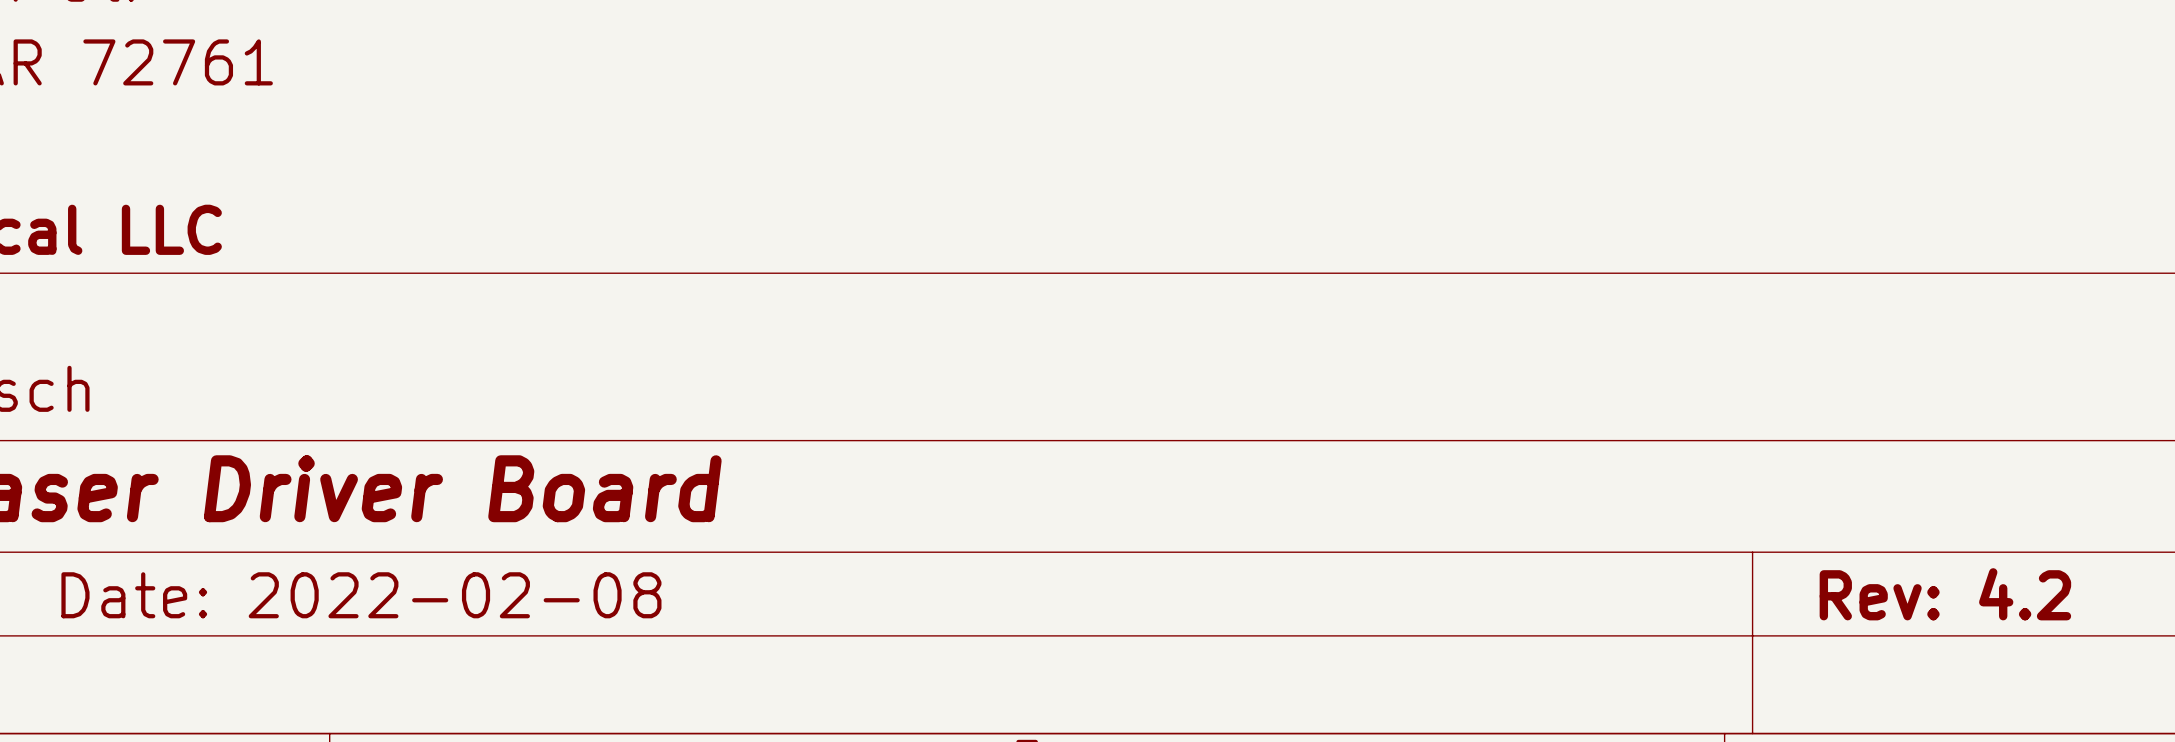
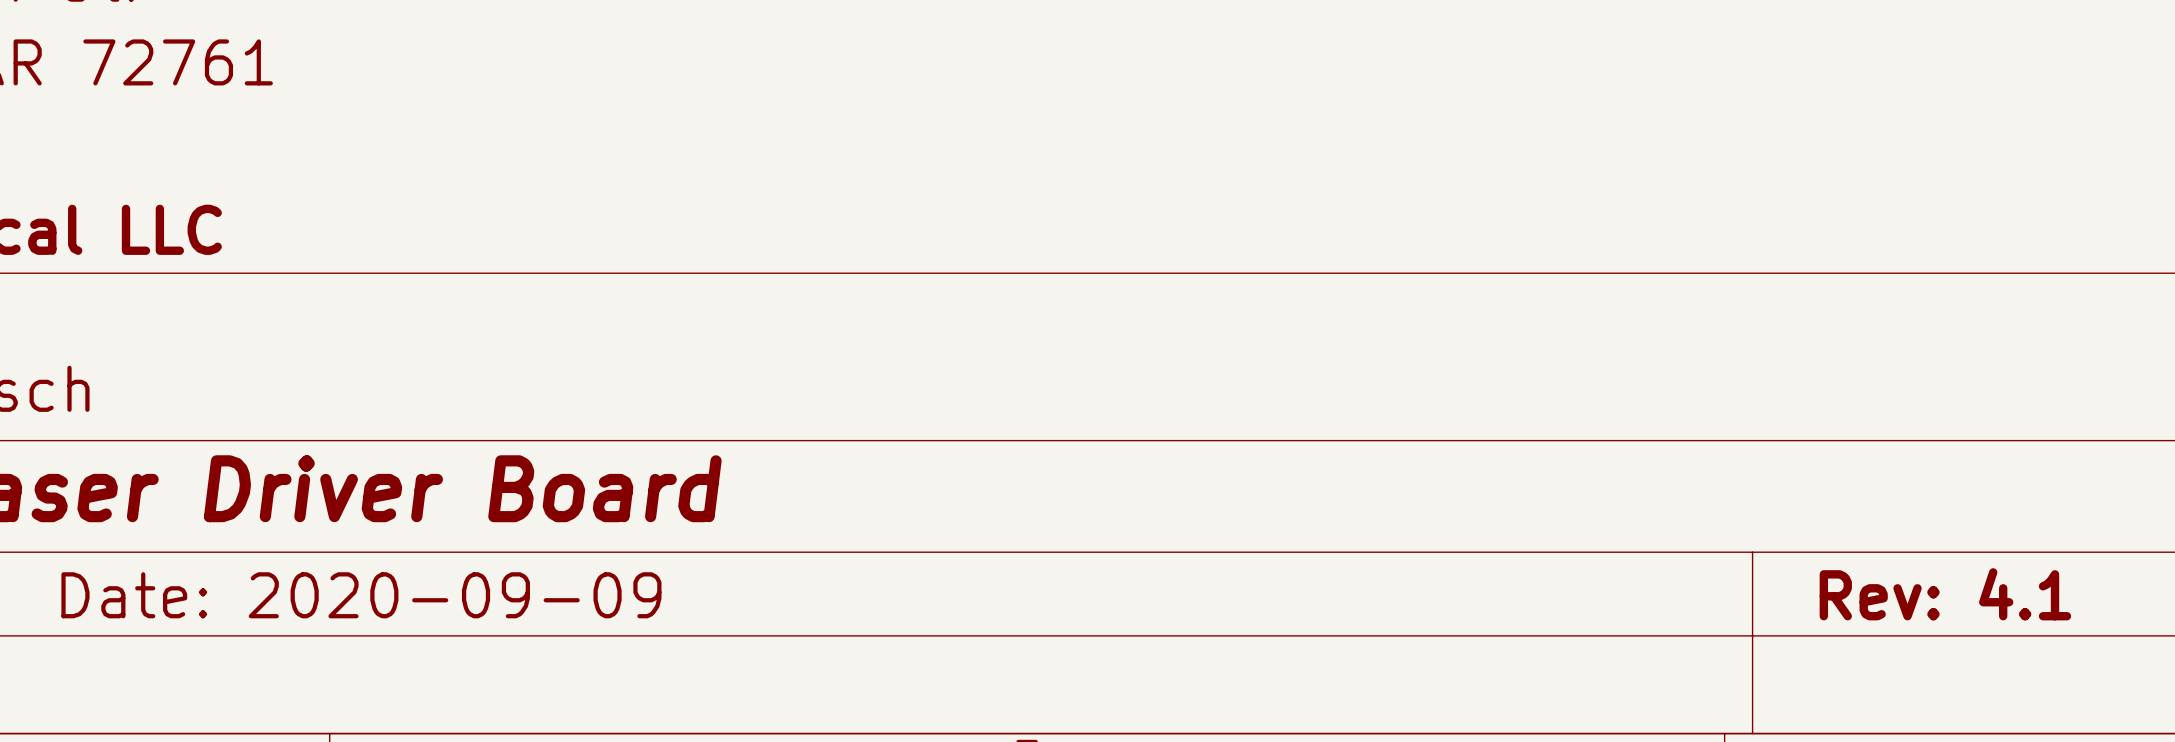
title block: Rev: 4.2 (1945, 594) -> Rev: 4.1 (1945, 594)
title block: Date: 2022-02-08 (361, 595) -> Date: 2020-09-09 (361, 595)

